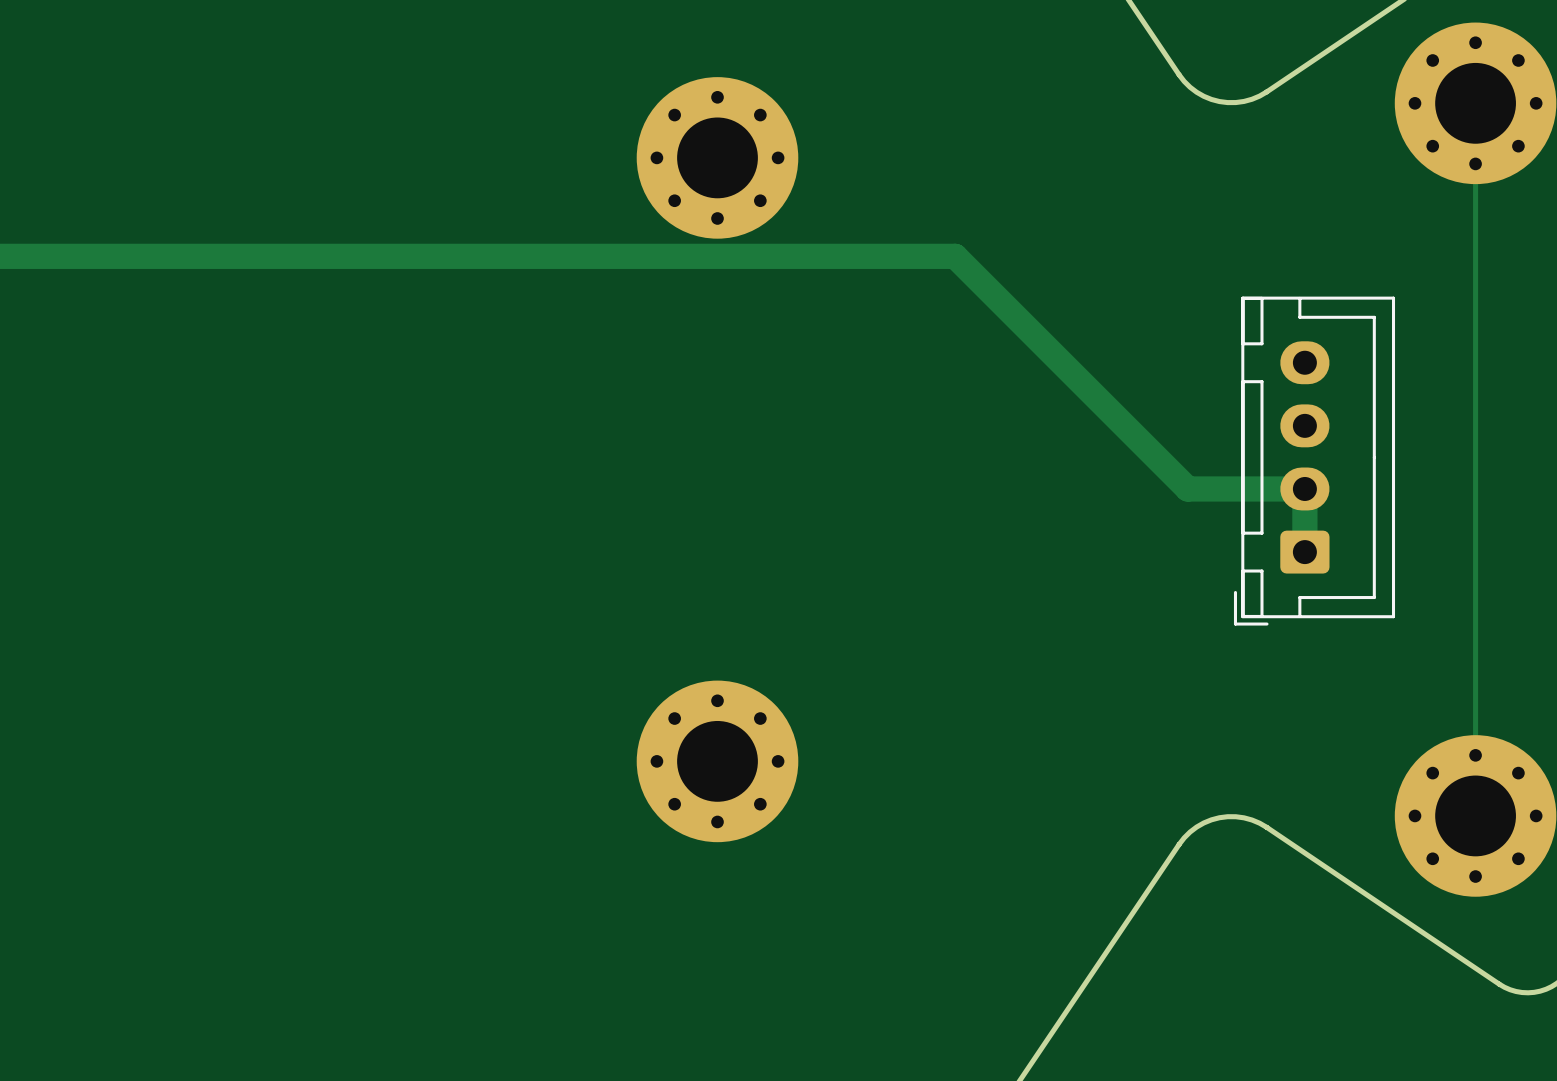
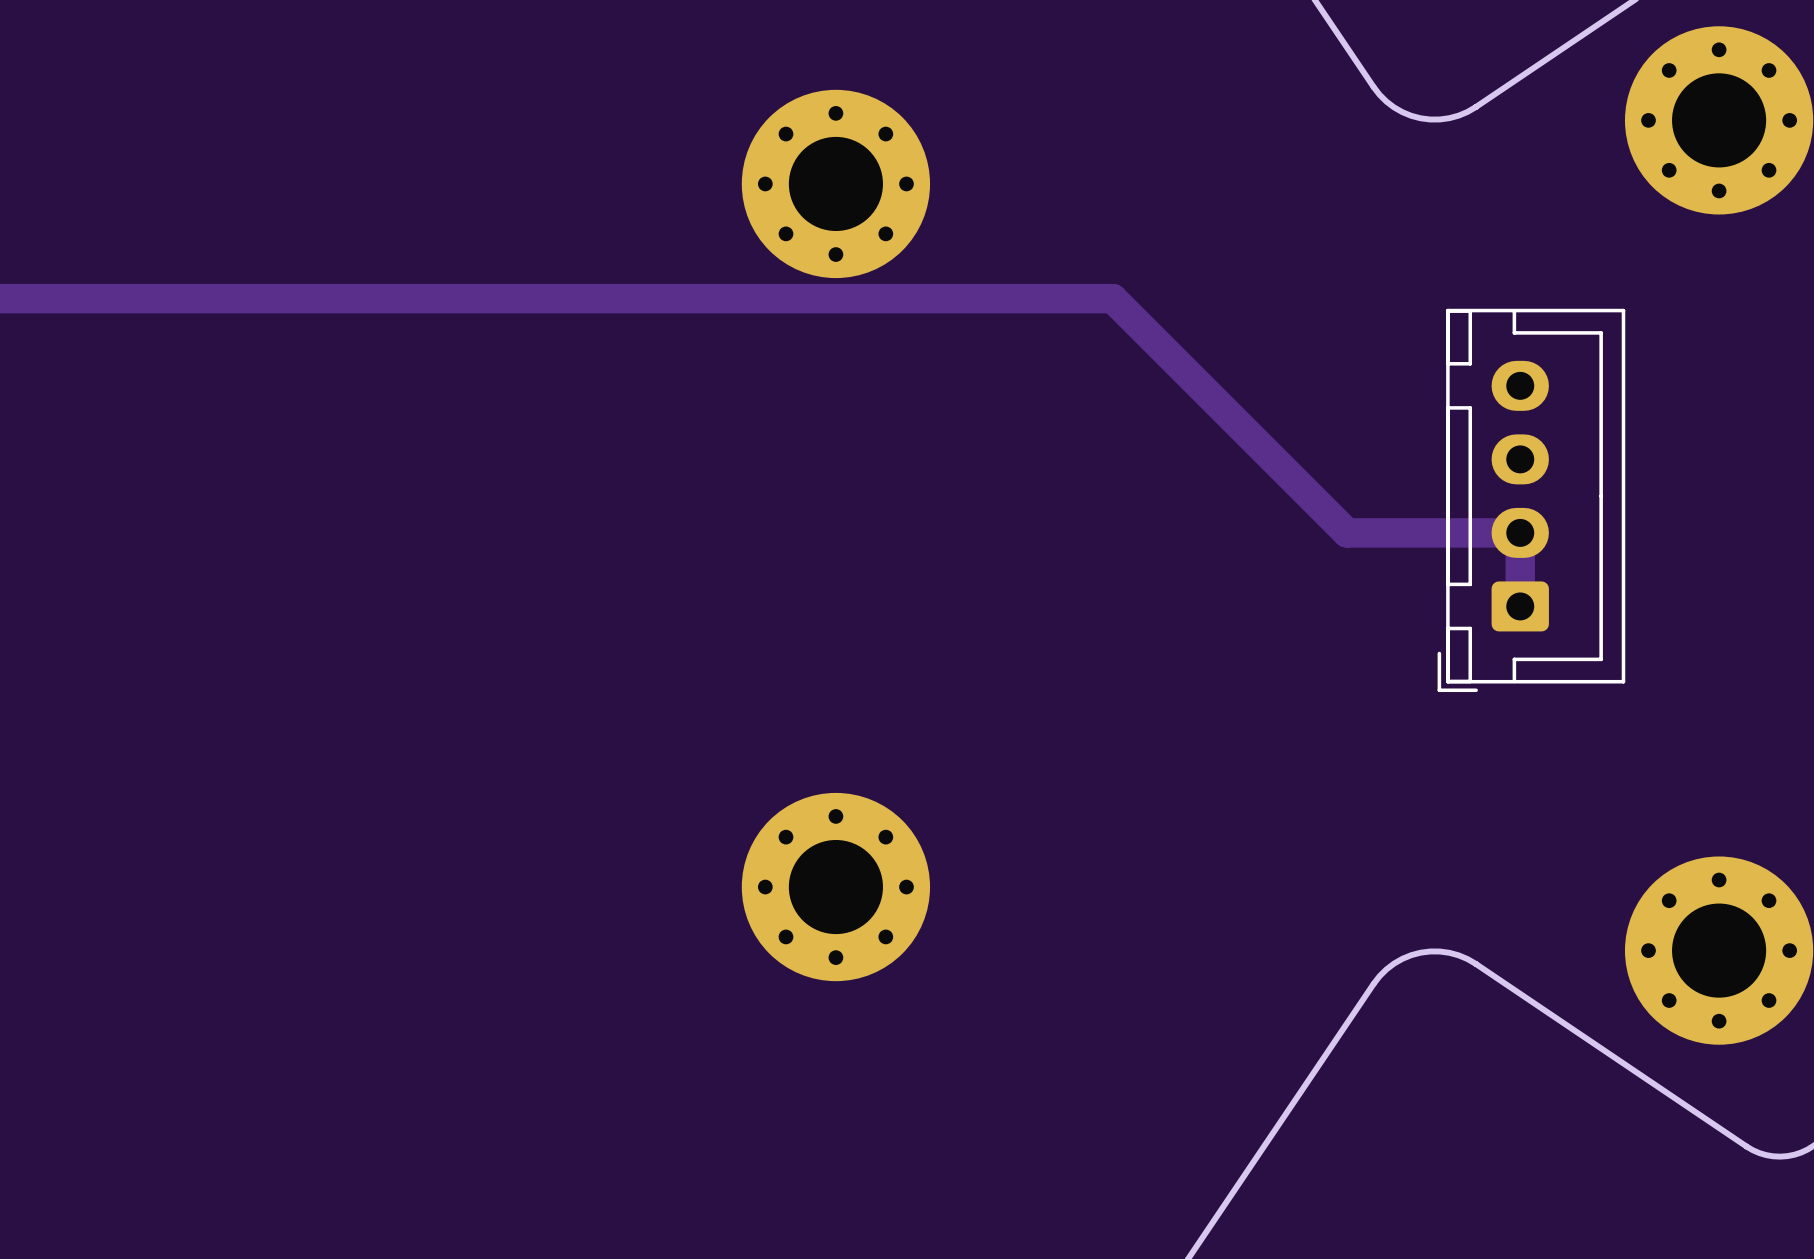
track: (1475, 103) (1475, 815) -> none
track: (1156, 457) (1187, 488) (1304, 488) -> (1347, 532) (1520, 532) (1520, 569)
part position: (1314, 461) -> (1531, 500)

